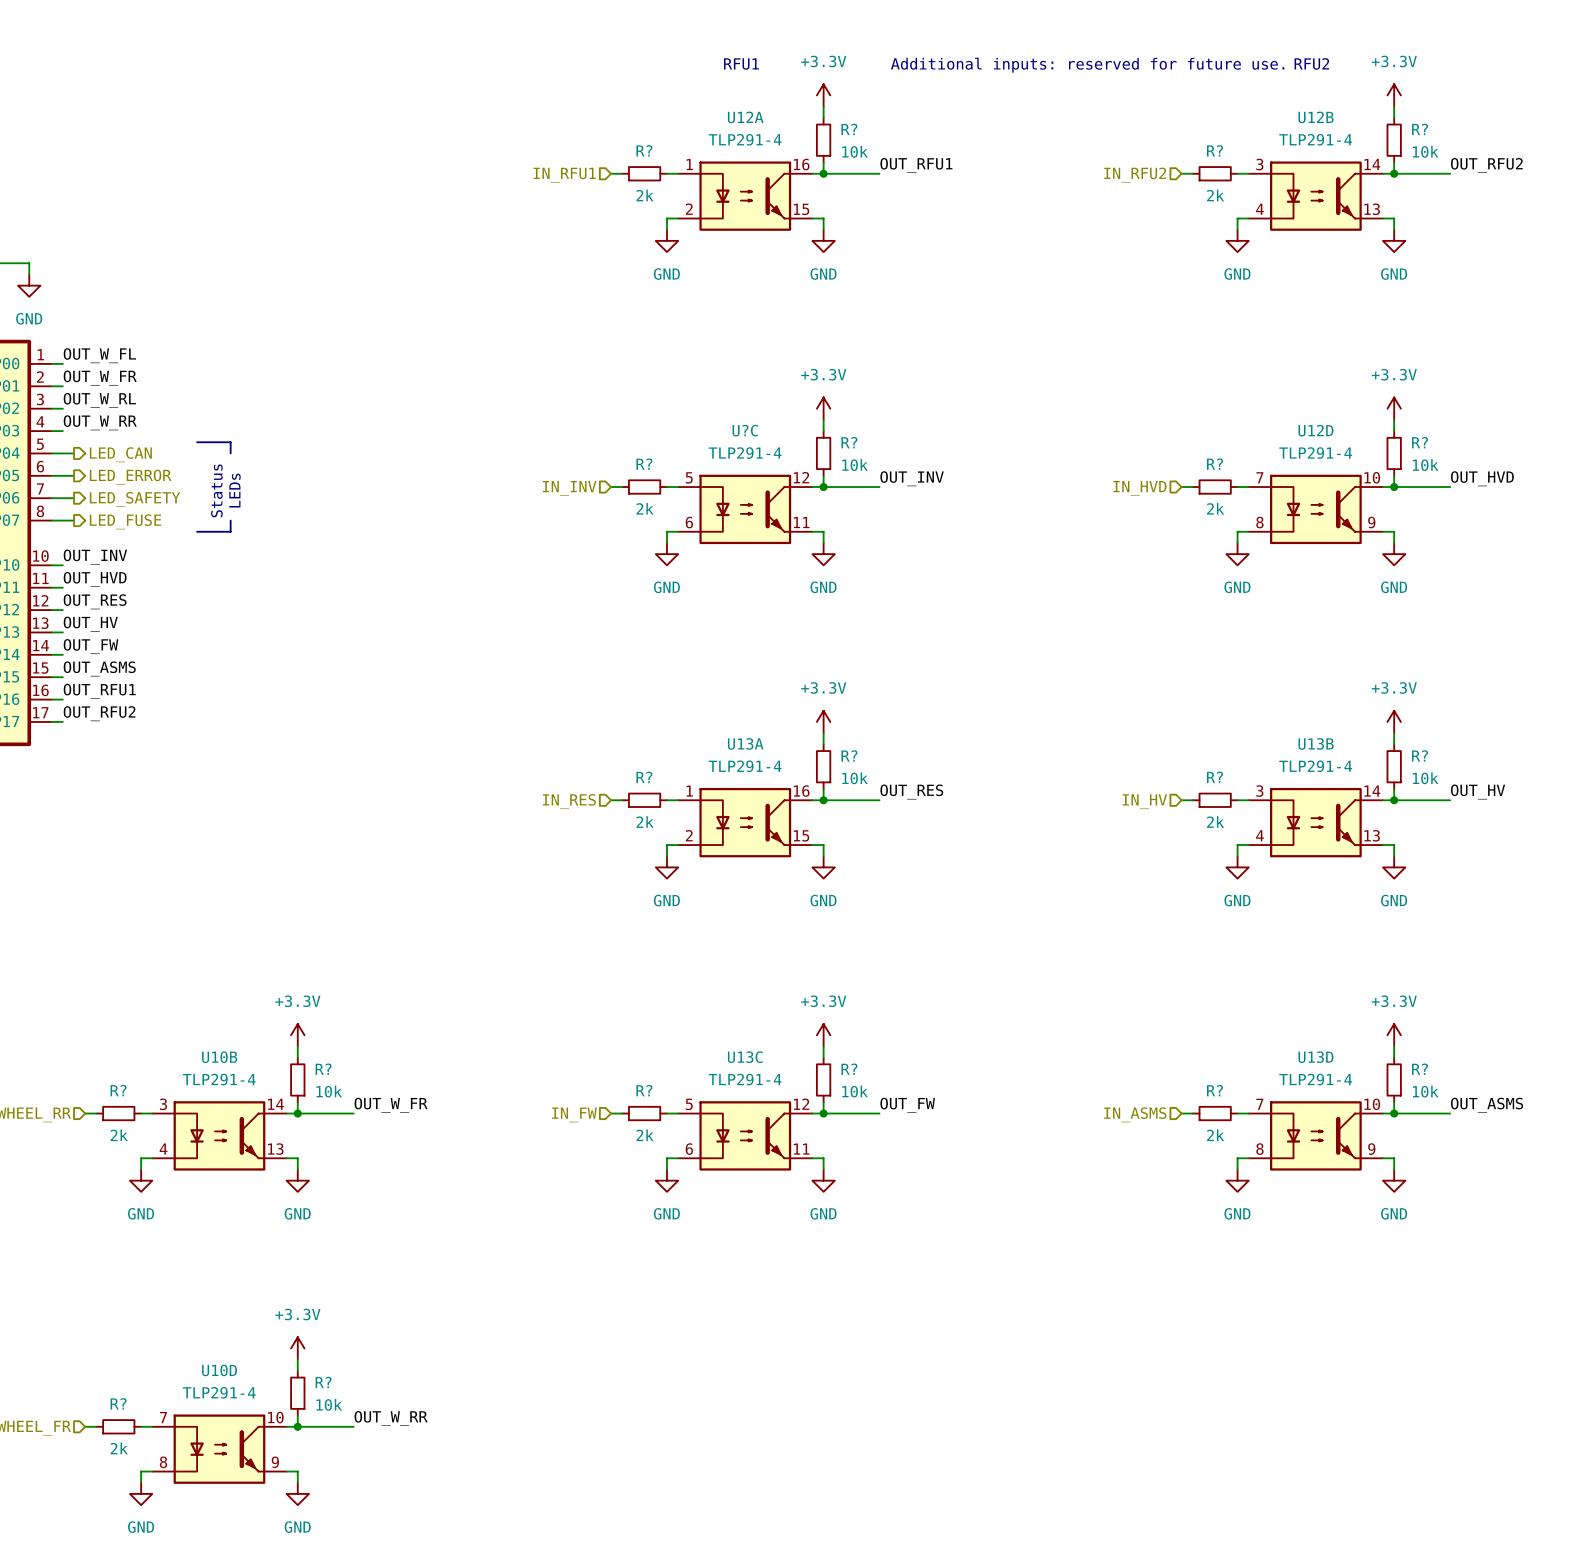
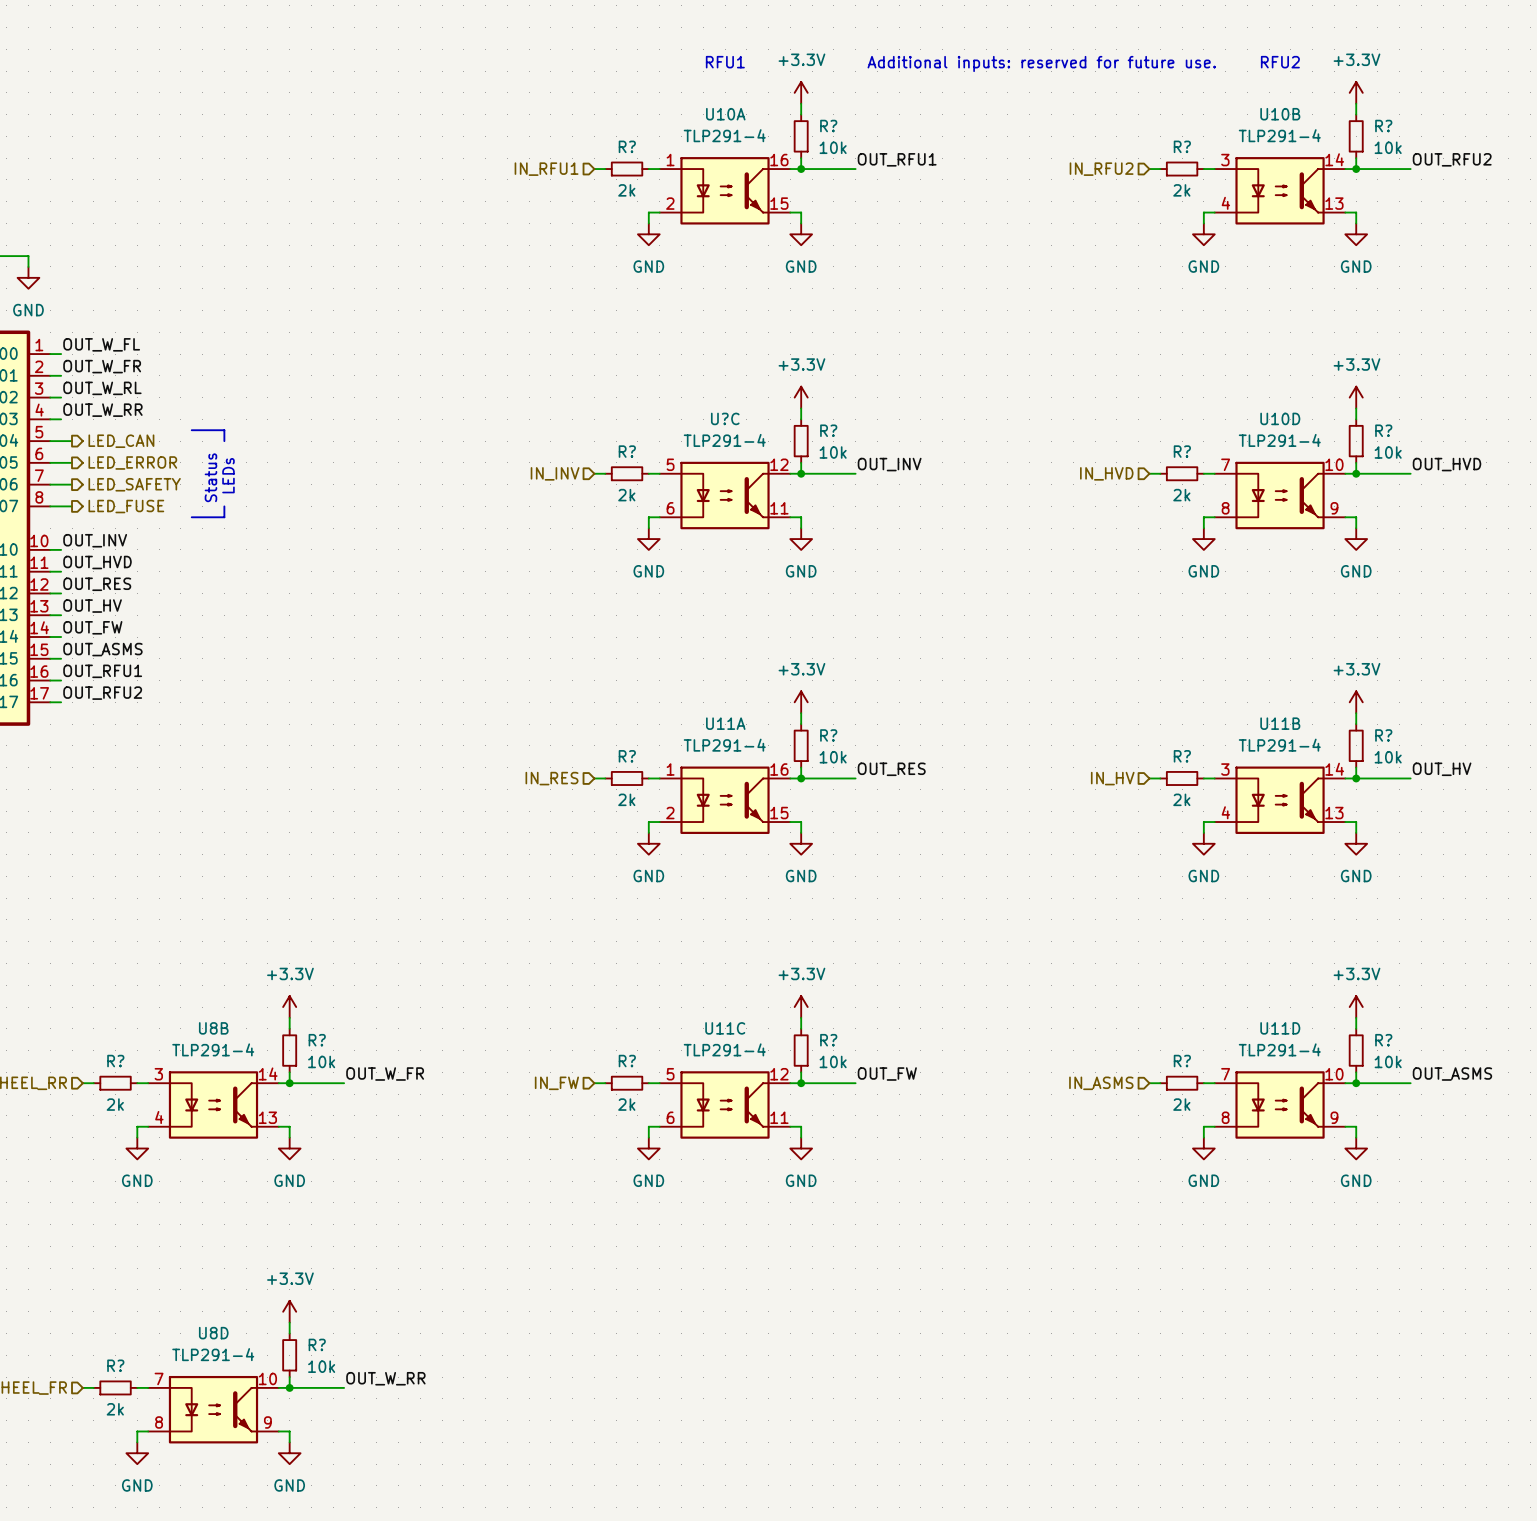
U12A name: U12A (745, 117) -> U10A (725, 114)
U12B name: U12B (1316, 117) -> U10B (1280, 114)
U12D name: U12D (1315, 430) -> U10D (1280, 418)
U13A name: U13A (745, 743) -> U11A (725, 723)
U13B name: U13B (1316, 743) -> U11B (1280, 723)
U10B name: U10B (219, 1057) -> U8B (213, 1028)
U13C name: U13C (745, 1057) -> U11C (725, 1028)
U13D name: U13D (1315, 1057) -> U11D (1280, 1028)
U10D name: U10D (219, 1370) -> U8D (213, 1333)

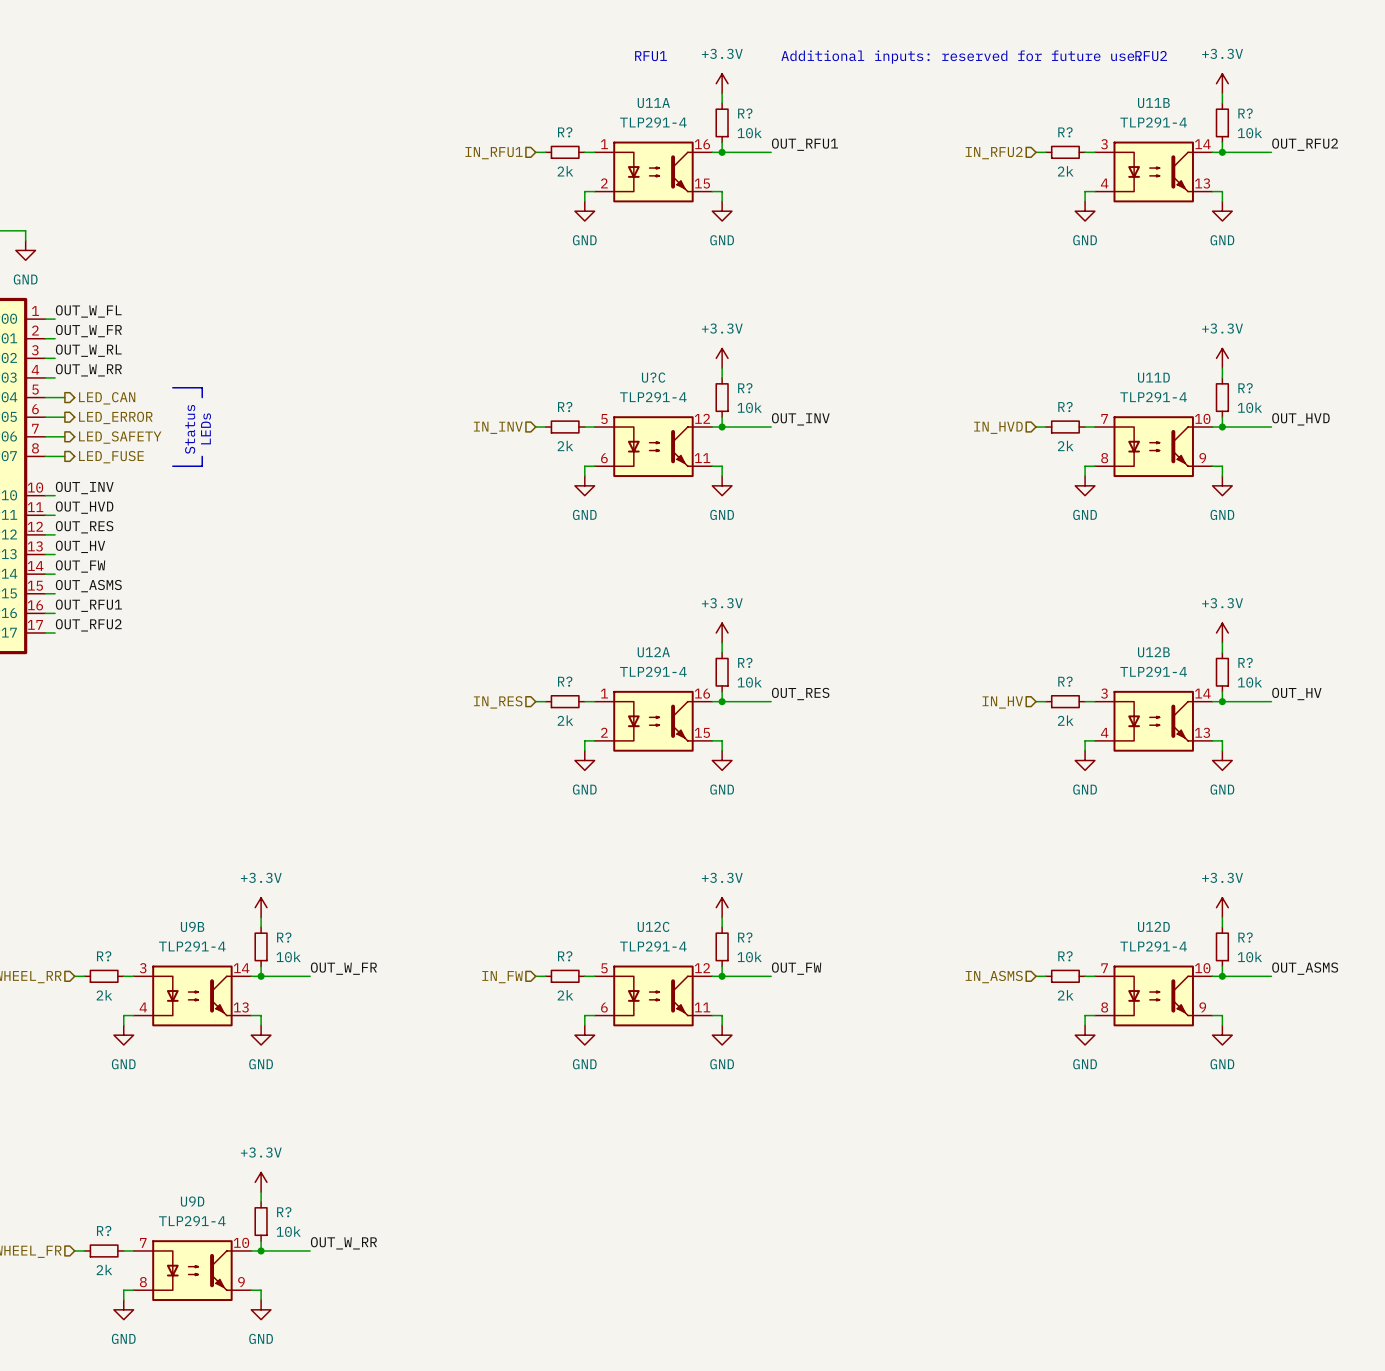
U10A name: U10A (725, 114) -> U11A (653, 103)
U10B name: U10B (1280, 114) -> U11B (1153, 103)
U10D name: U10D (1280, 418) -> U11D (1153, 377)
U11A name: U11A (725, 723) -> U12A (653, 652)
U11B name: U11B (1280, 723) -> U12B (1153, 652)
U8B name: U8B (213, 1028) -> U9B (192, 926)
U11C name: U11C (725, 1028) -> U12C (653, 926)
U11D name: U11D (1280, 1028) -> U12D (1153, 926)
U8D name: U8D (213, 1333) -> U9D (192, 1201)

